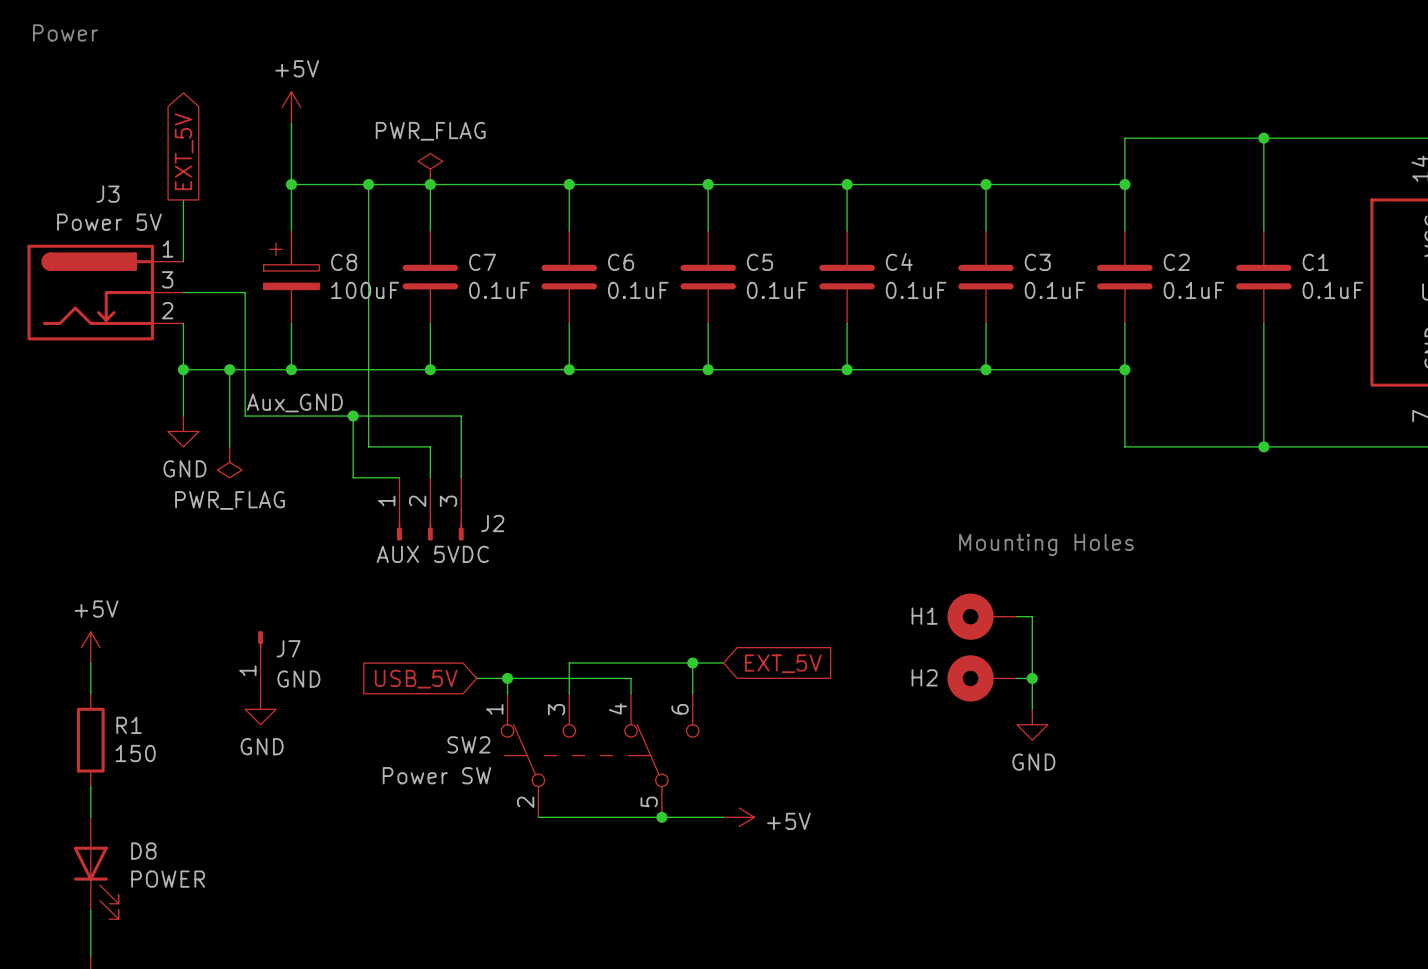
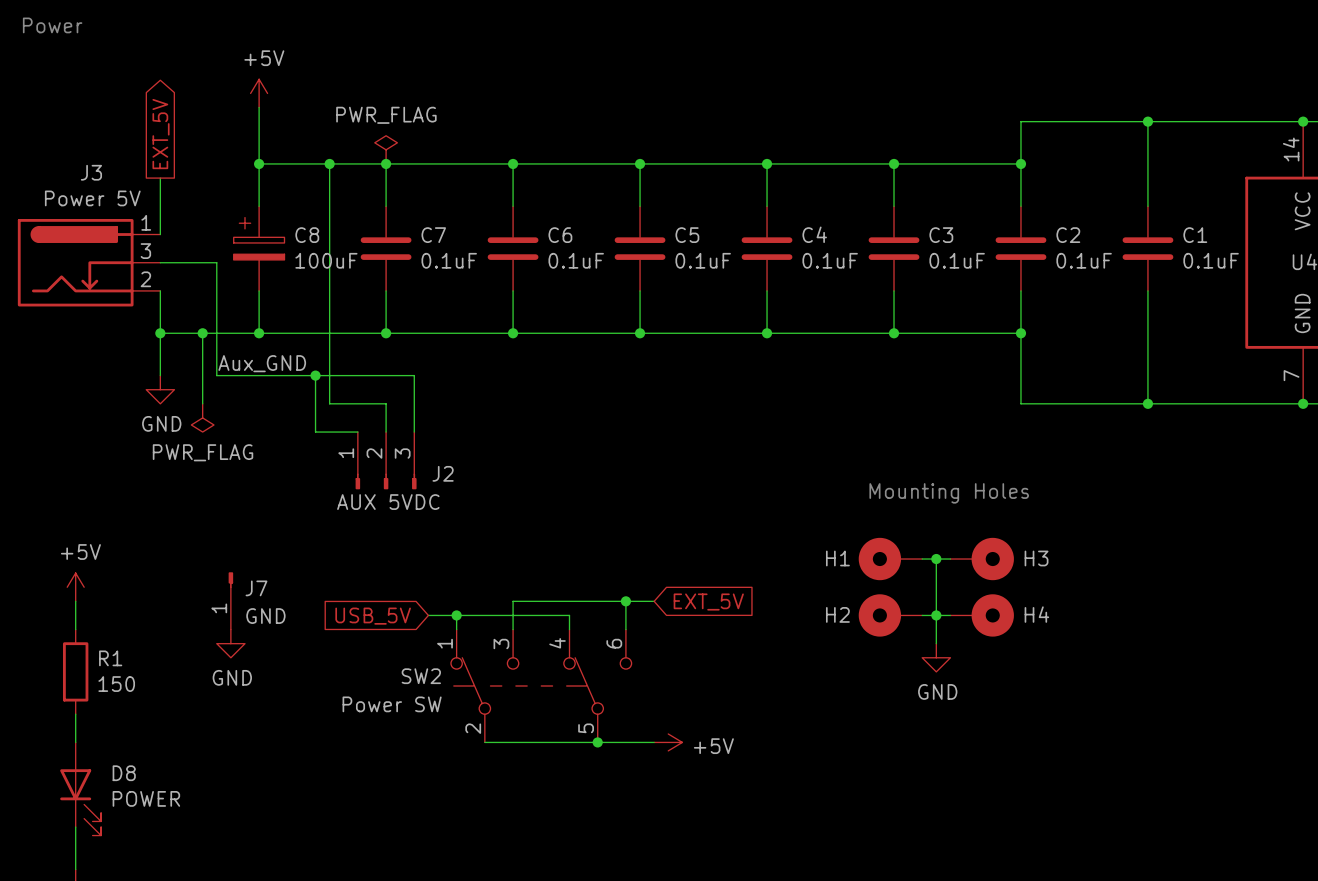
wire: none -> (936, 559) (950, 559)
junction: none -> (936, 559)
H3: none -> (982, 559)
wire: none -> (936, 615) (950, 615)
H4: none -> (982, 615)

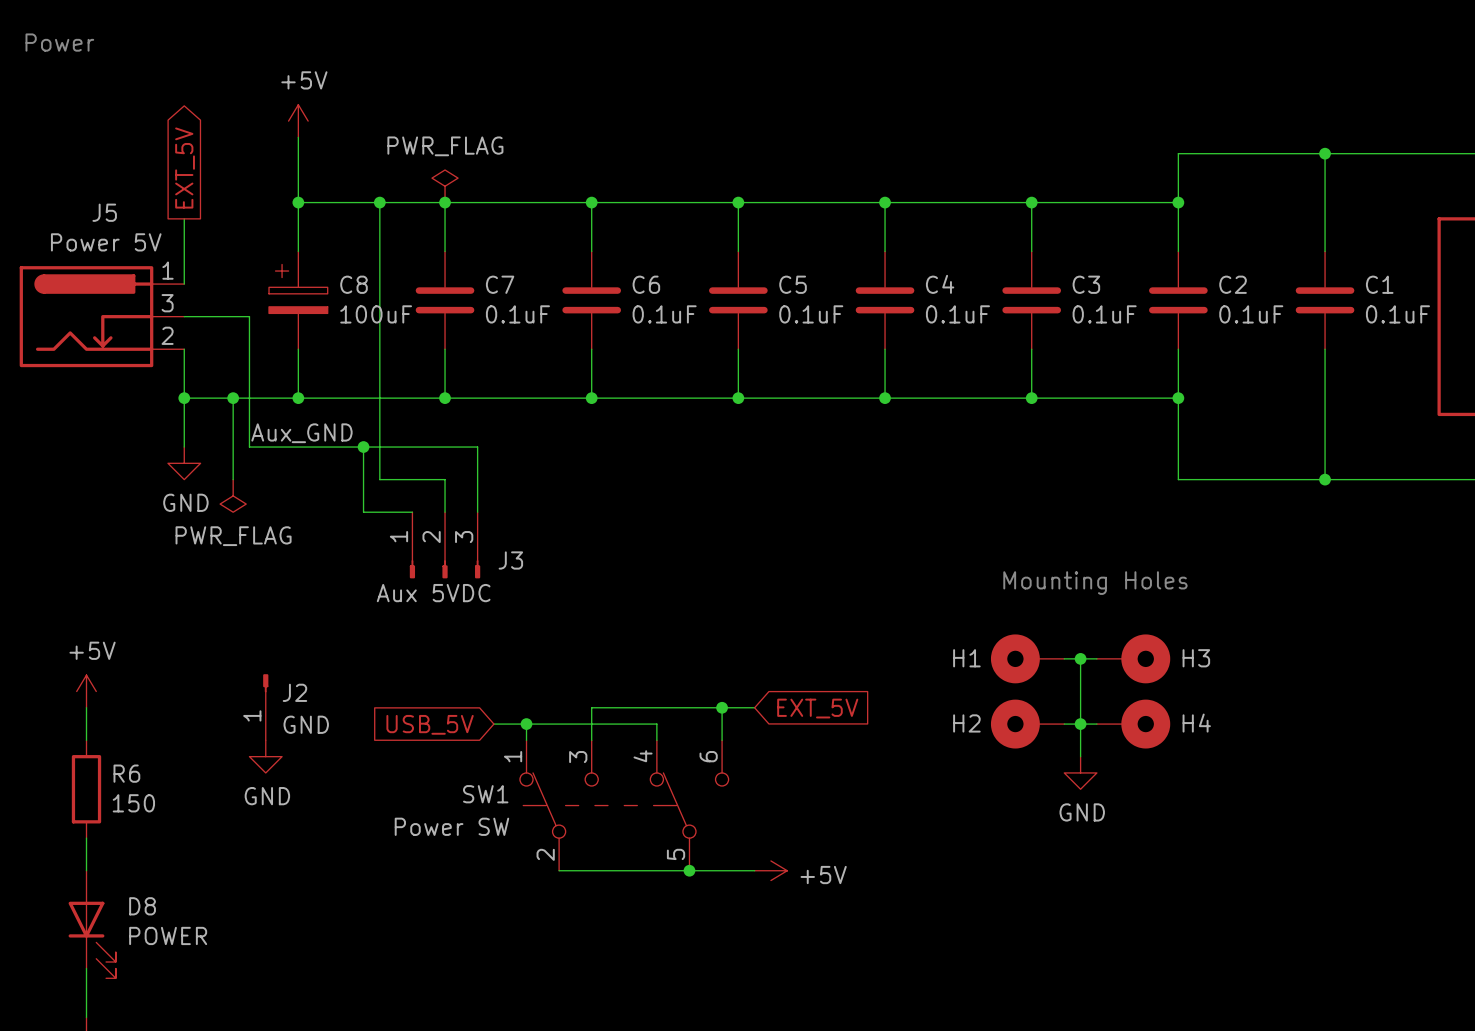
J3 name: J3 (91, 172) -> J5 (104, 212)
J2 name: J2 (443, 473) -> J3 (510, 560)
J2 value: AUX 5VDC (388, 502) -> Aux 5VDC (433, 593)
J7 name: J7 (256, 588) -> J2 (294, 692)
R1 name: R1 (110, 658) -> R6 (126, 773)
SW2 name: SW2 (421, 676) -> SW1 (485, 794)

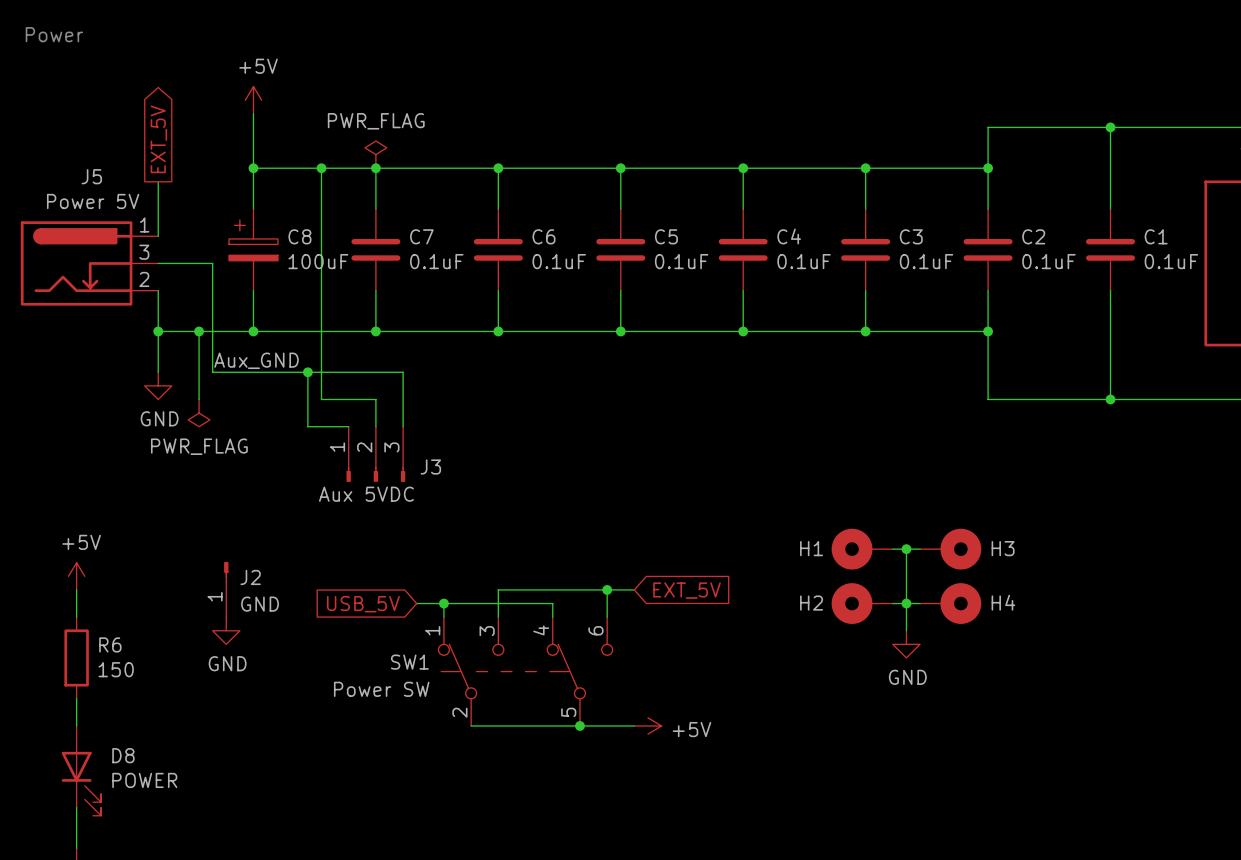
text: Mounting Holes (1095, 583) -> none

